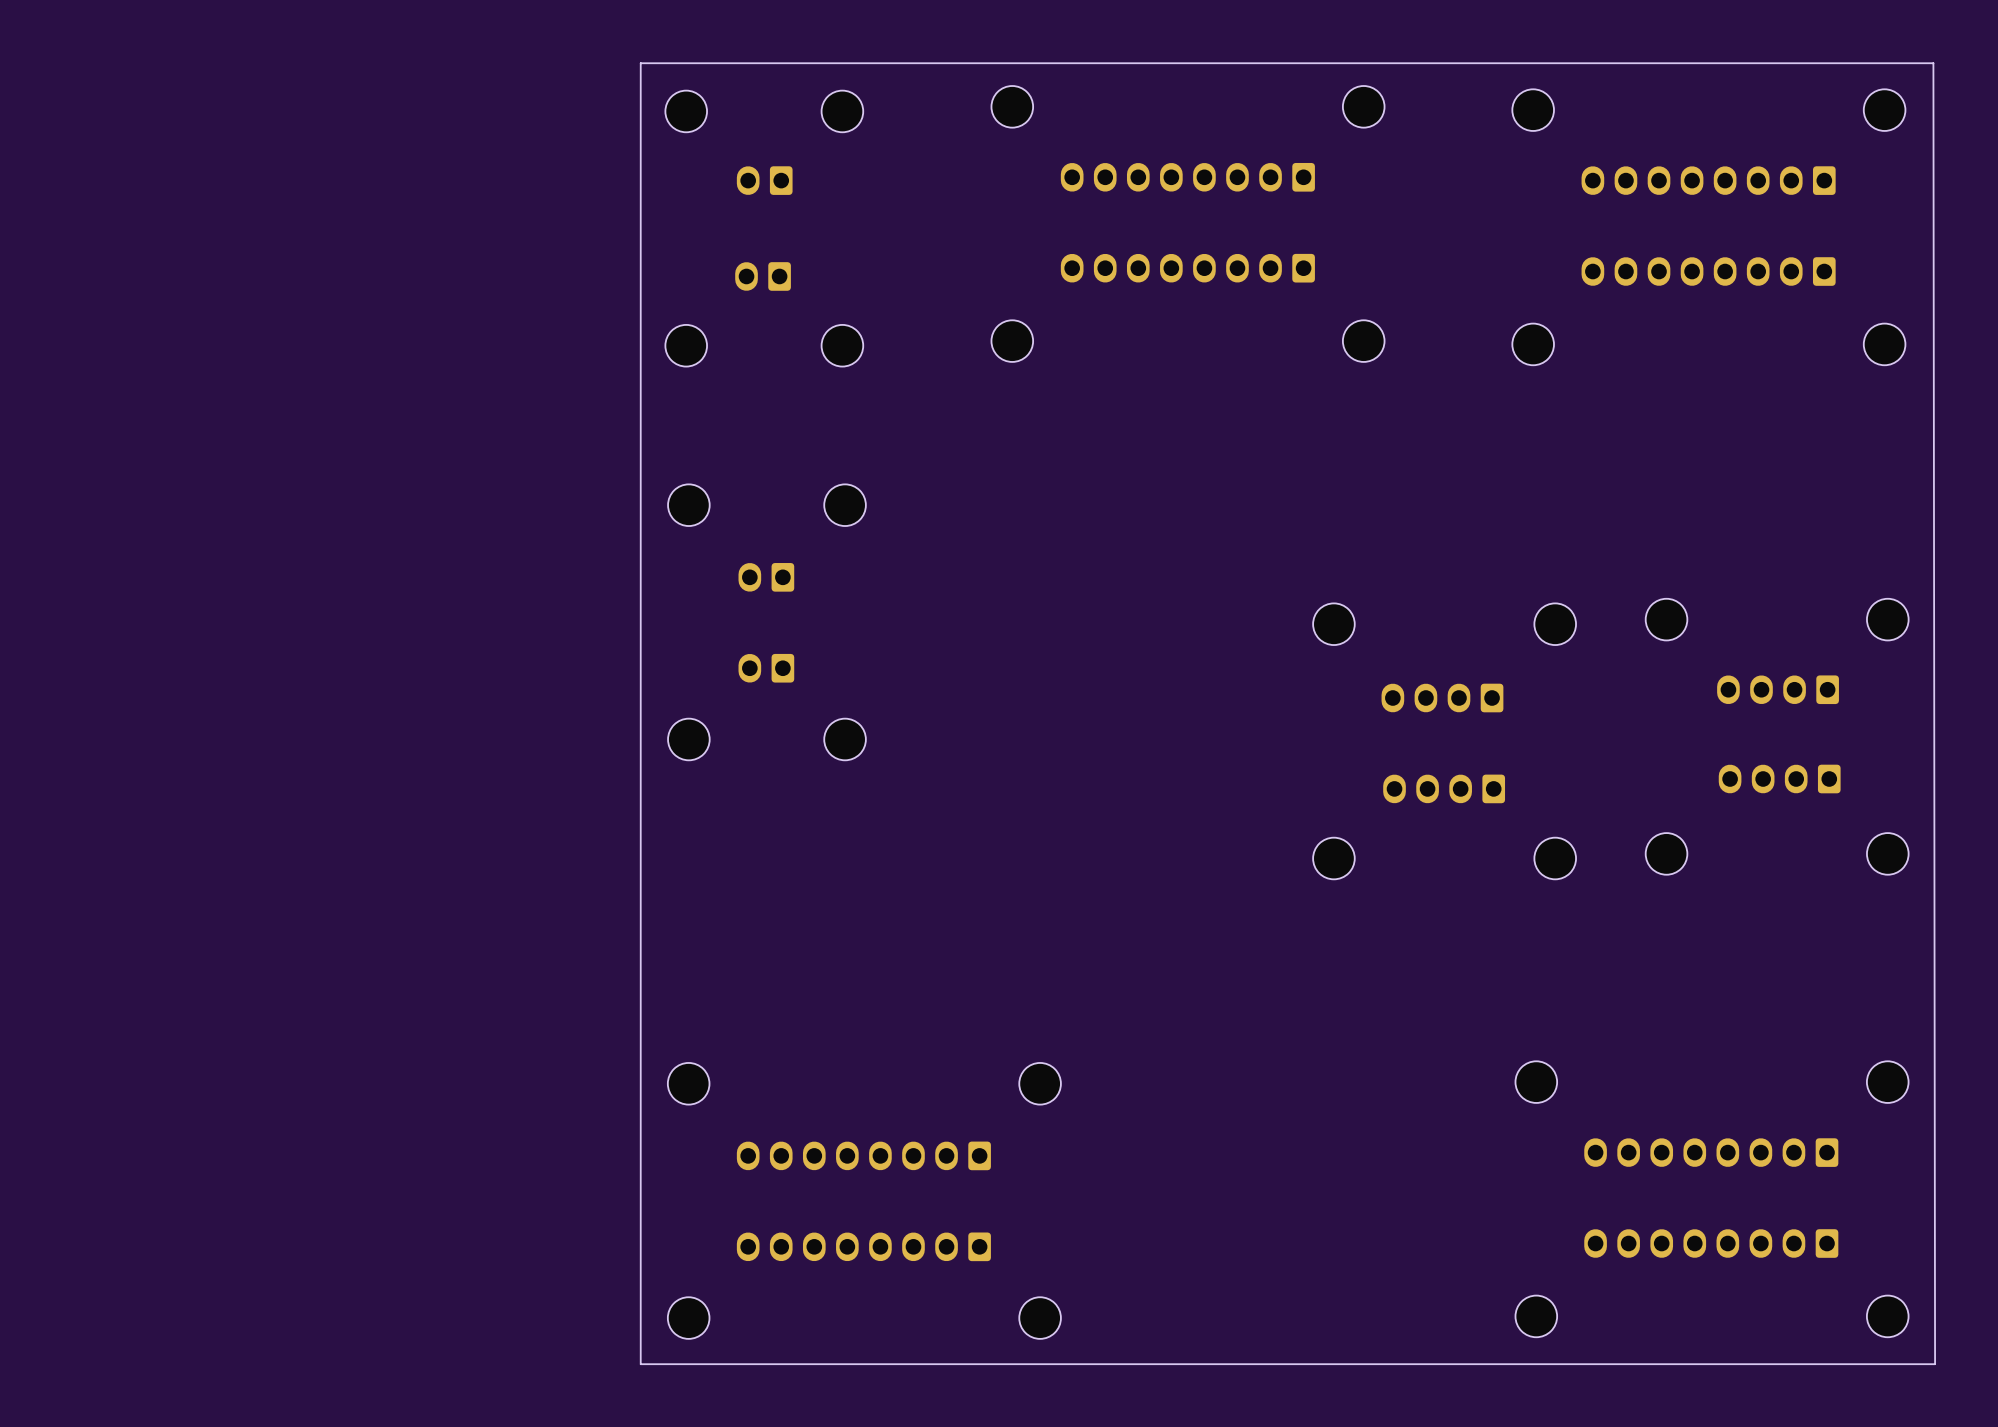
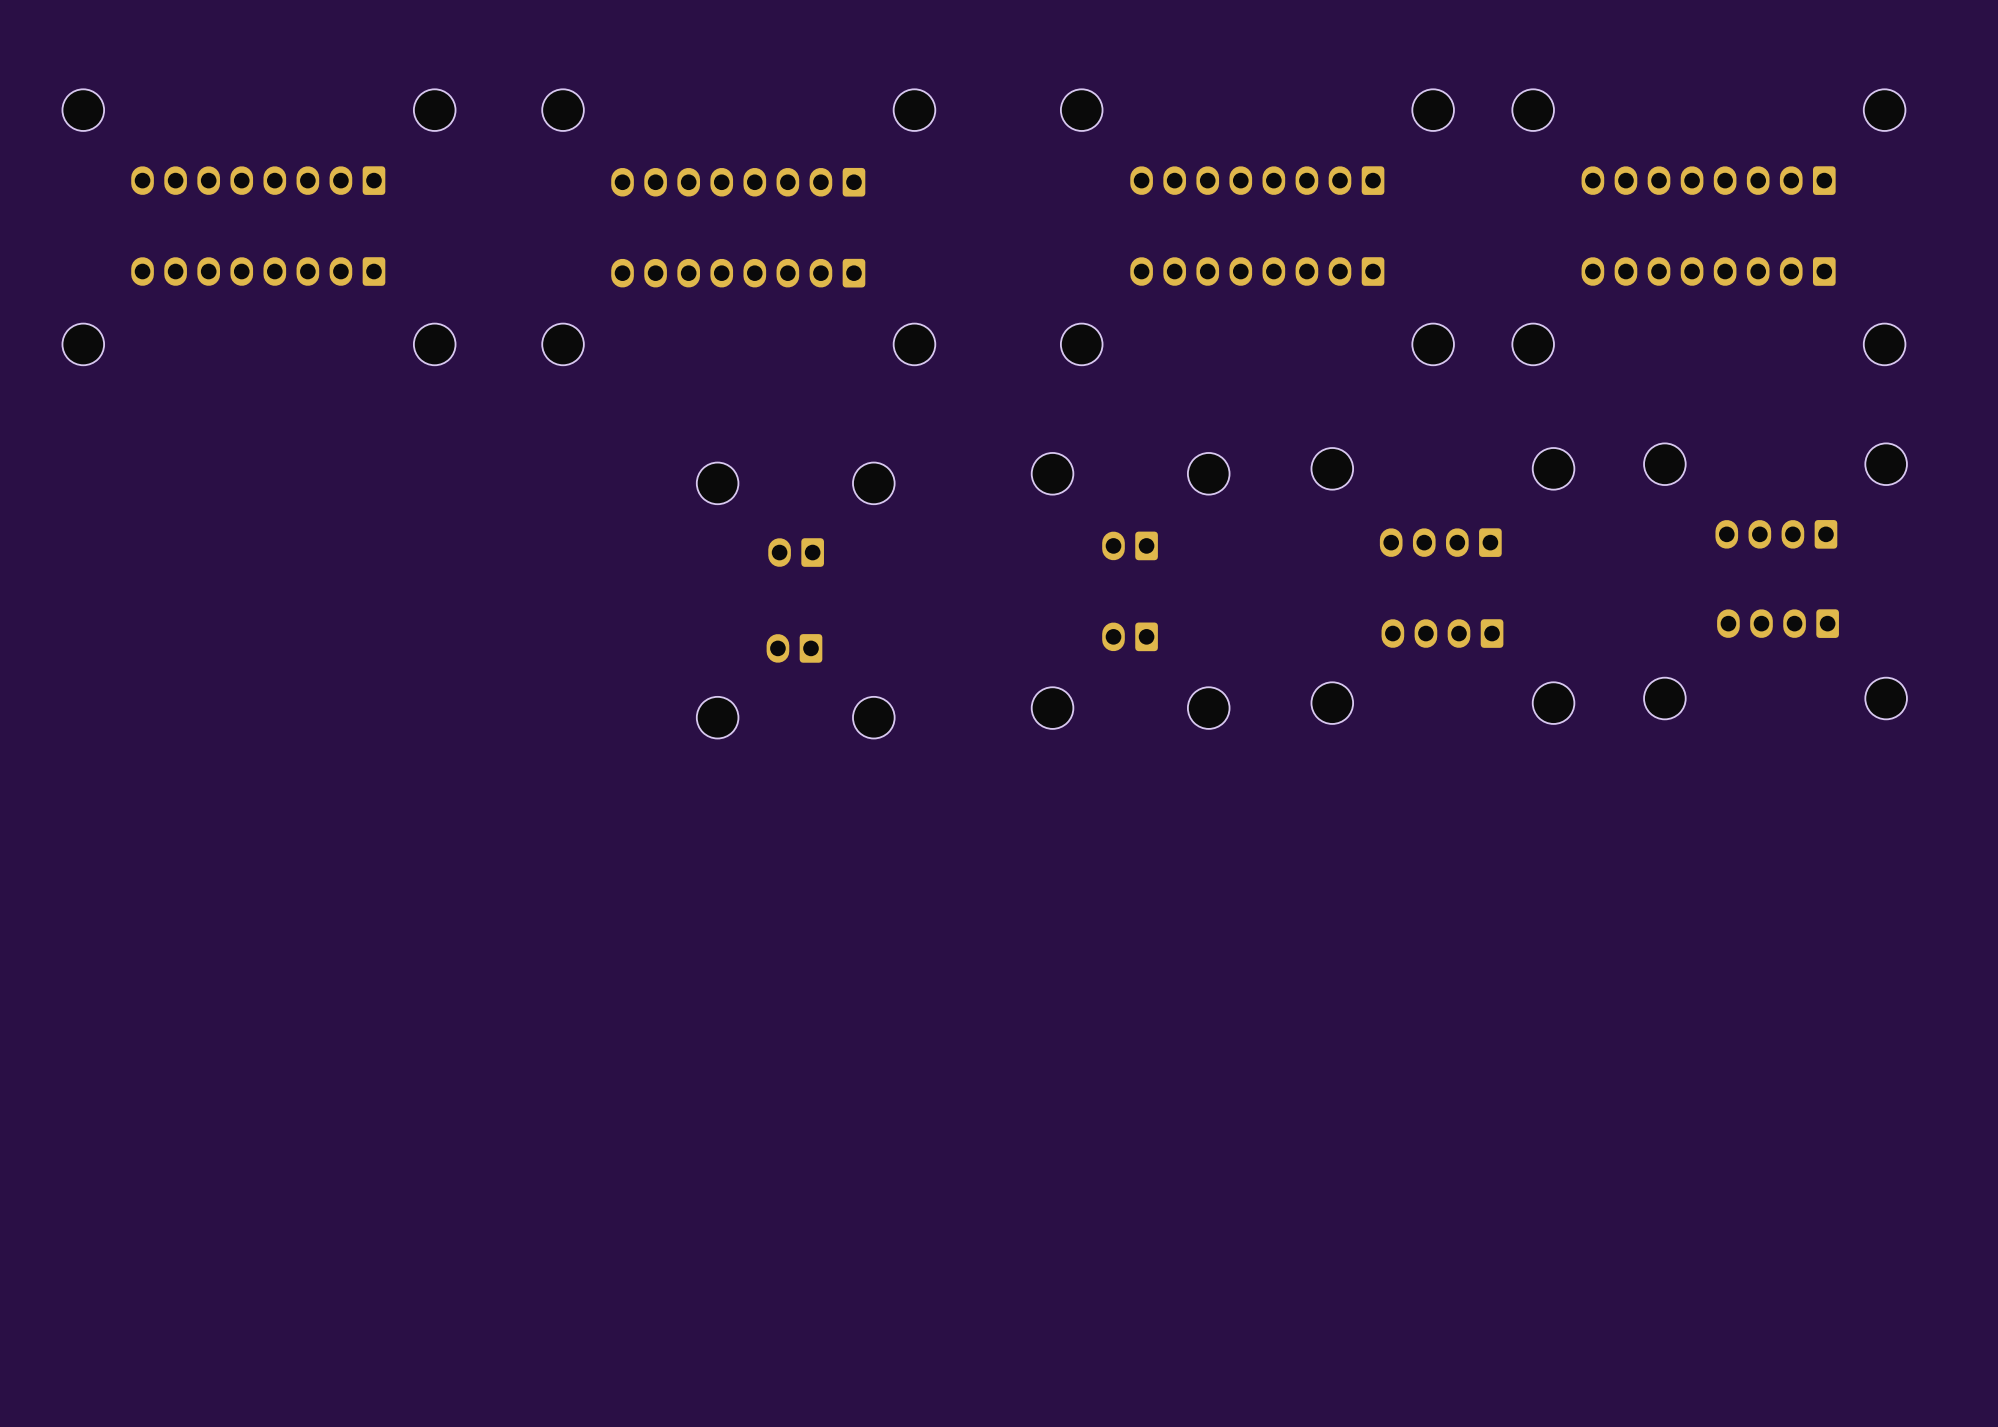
board edge: (1933, 63) (1935, 1364) (640, 1364) (640, 63) (1933, 63) -> none
part: (1012, 106) -> none
part position: (1363, 106) -> (1433, 110)
part: none -> (83, 110)
part: none -> (434, 110)
part: none -> (563, 110)
part: none -> (914, 110)
part: none -> (1081, 110)
part: (686, 111) -> none
part: (842, 111) -> none
part: (1187, 177) -> none
part: none -> (258, 180)
part: (764, 180) -> none
part: none -> (1257, 180)
part: none -> (738, 182)
part: (1187, 268) -> none
part: none -> (258, 271)
part: none -> (1257, 271)
part: none -> (738, 273)
part: (763, 276) -> none
part: (1012, 341) -> none
part: (1363, 341) -> none
part: none -> (83, 344)
part: none -> (434, 344)
part: none -> (563, 344)
part: none -> (914, 344)
part: none -> (1081, 344)
part: none -> (1433, 344)
part: (686, 345) -> none
part: (842, 345) -> none
part: none -> (1664, 464)
part: none -> (1886, 464)
part: none -> (1332, 468)
part: none -> (1553, 468)
part: none -> (1052, 473)
part: none -> (1208, 473)
part position: (688, 505) -> (717, 483)
part position: (845, 505) -> (873, 483)
part: none -> (1776, 534)
part: none -> (1440, 542)
part: none -> (1130, 545)
part: none -> (796, 552)
part: (766, 577) -> none
part: (1666, 619) -> none
part: (1887, 619) -> none
part: (1333, 624) -> none
part: (1555, 624) -> none
part: none -> (1130, 636)
part position: (766, 668) -> (794, 648)
part position: (1778, 689) -> (1778, 623)
part position: (1442, 698) -> (1442, 633)
part: none -> (1664, 698)
part: none -> (1886, 698)
part: none -> (1332, 703)
part: none -> (1553, 703)
part: none -> (1052, 708)
part: none -> (1208, 708)
part position: (688, 739) -> (717, 717)
part position: (845, 739) -> (873, 717)
part: (1779, 779) -> none
part: (1444, 788) -> none
part: (1666, 853) -> none
part: (1887, 853) -> none
part: (1333, 858) -> none
part: (1555, 858) -> none
part: (1536, 1082) -> none
part: (1887, 1082) -> none
part: (688, 1083) -> none
part: (1040, 1083) -> none
part: (1711, 1152) -> none
part: (863, 1155) -> none
part: (1711, 1243) -> none
part: (863, 1246) -> none
part: (1536, 1316) -> none
part: (1887, 1316) -> none
part: (688, 1318) -> none
part: (1040, 1318) -> none

